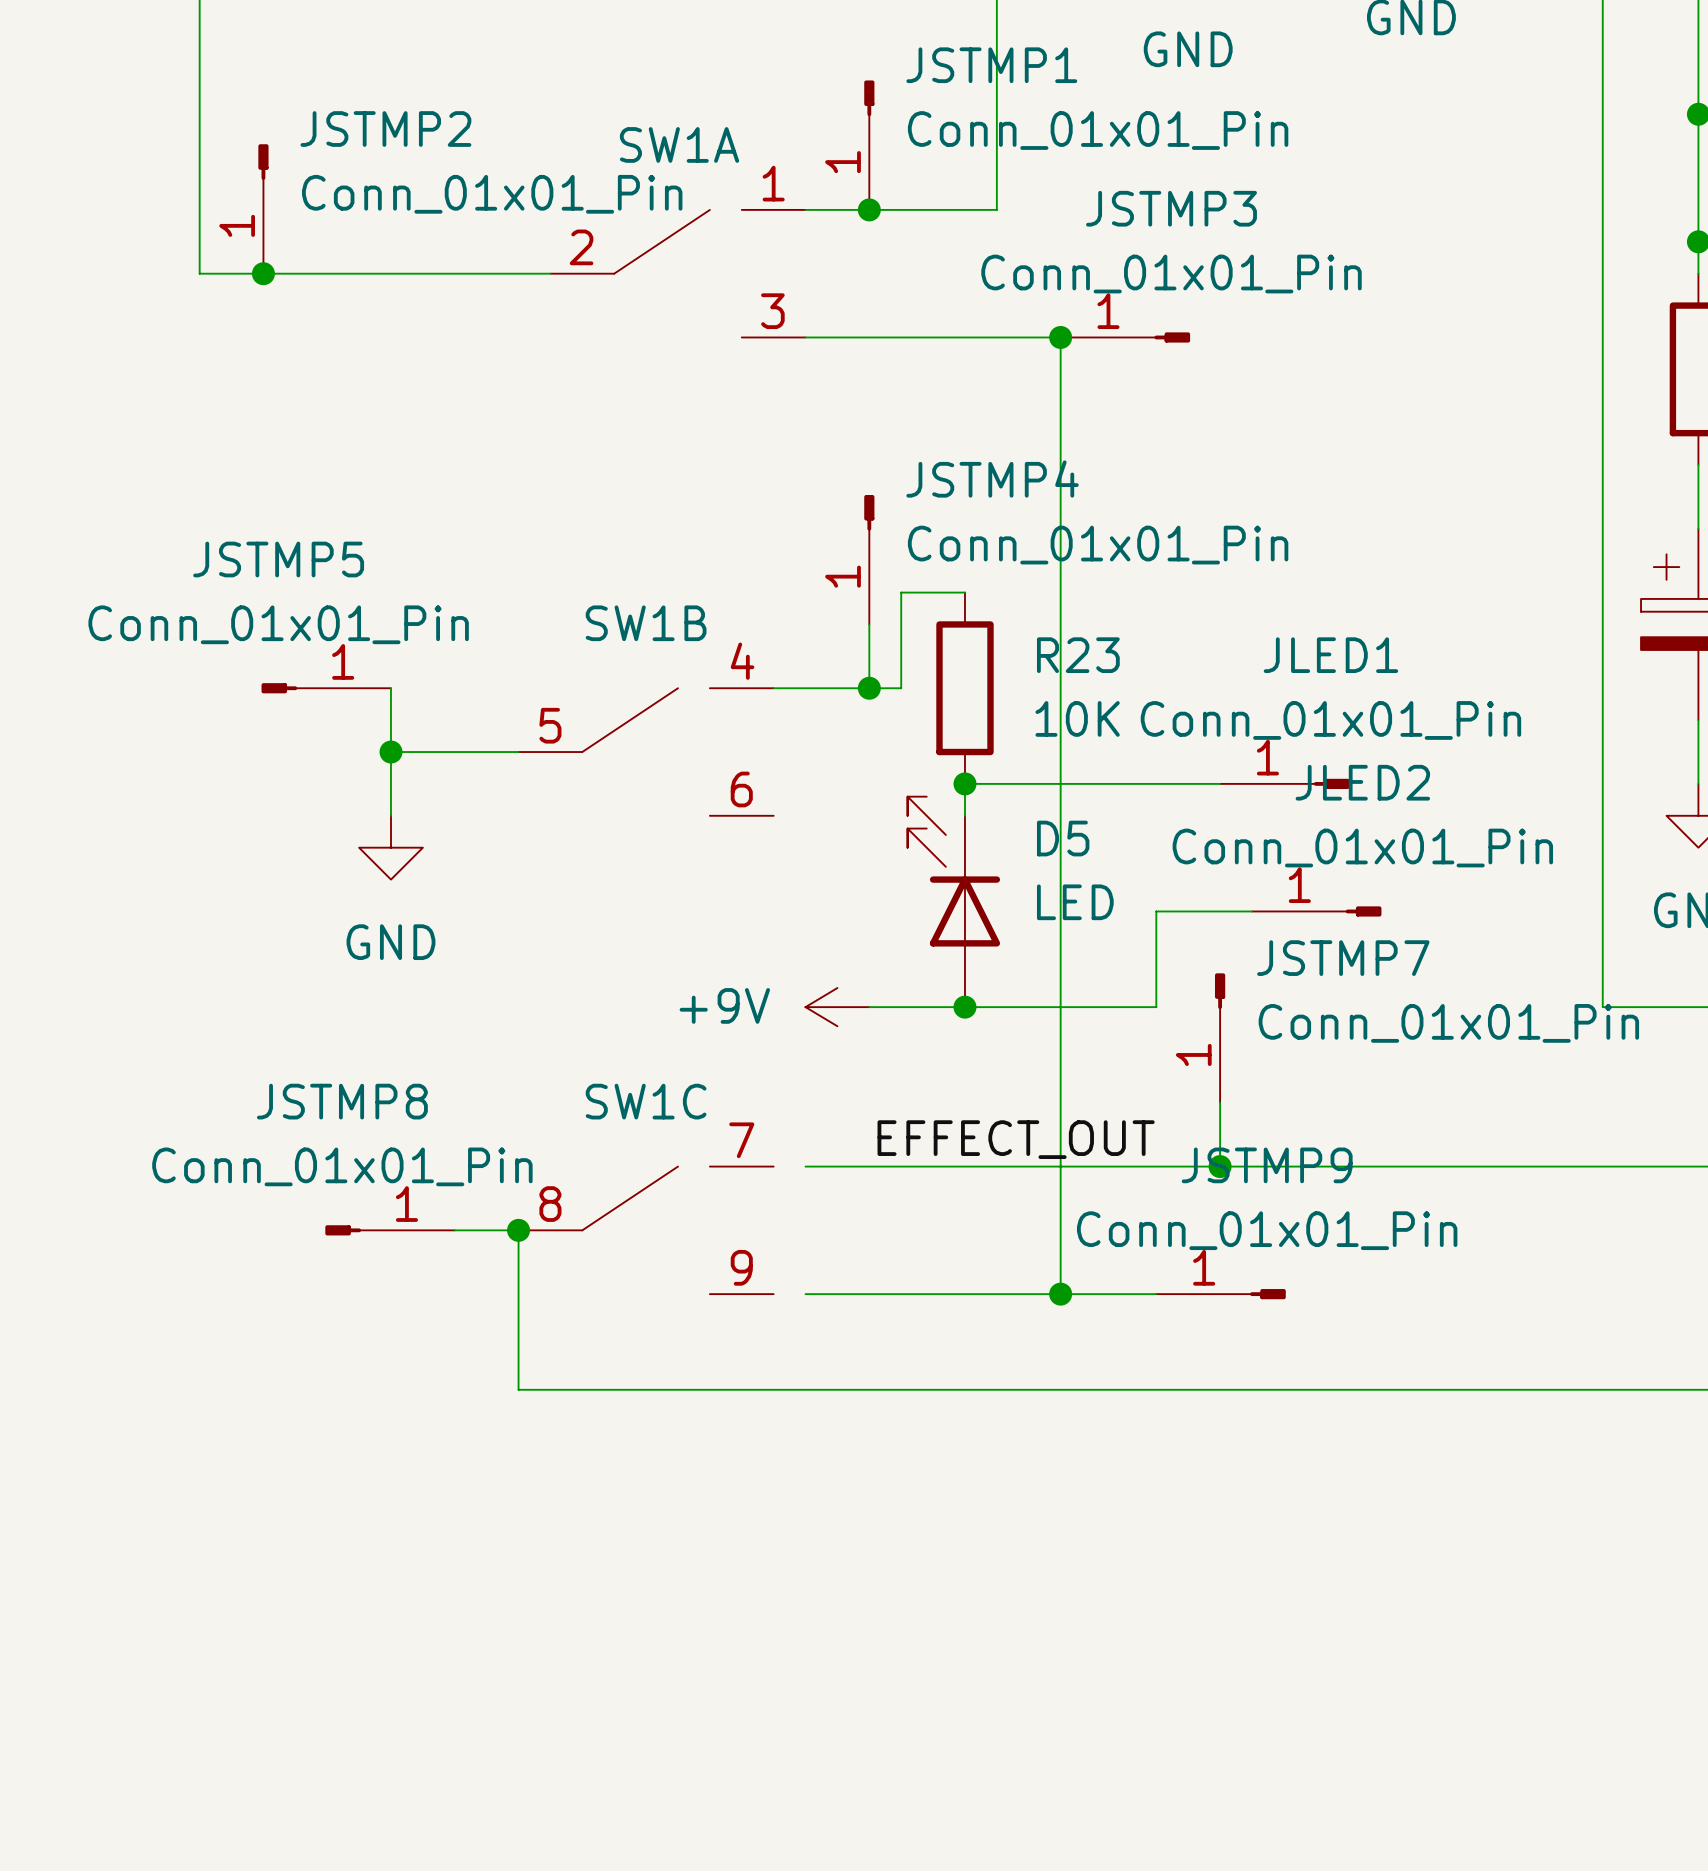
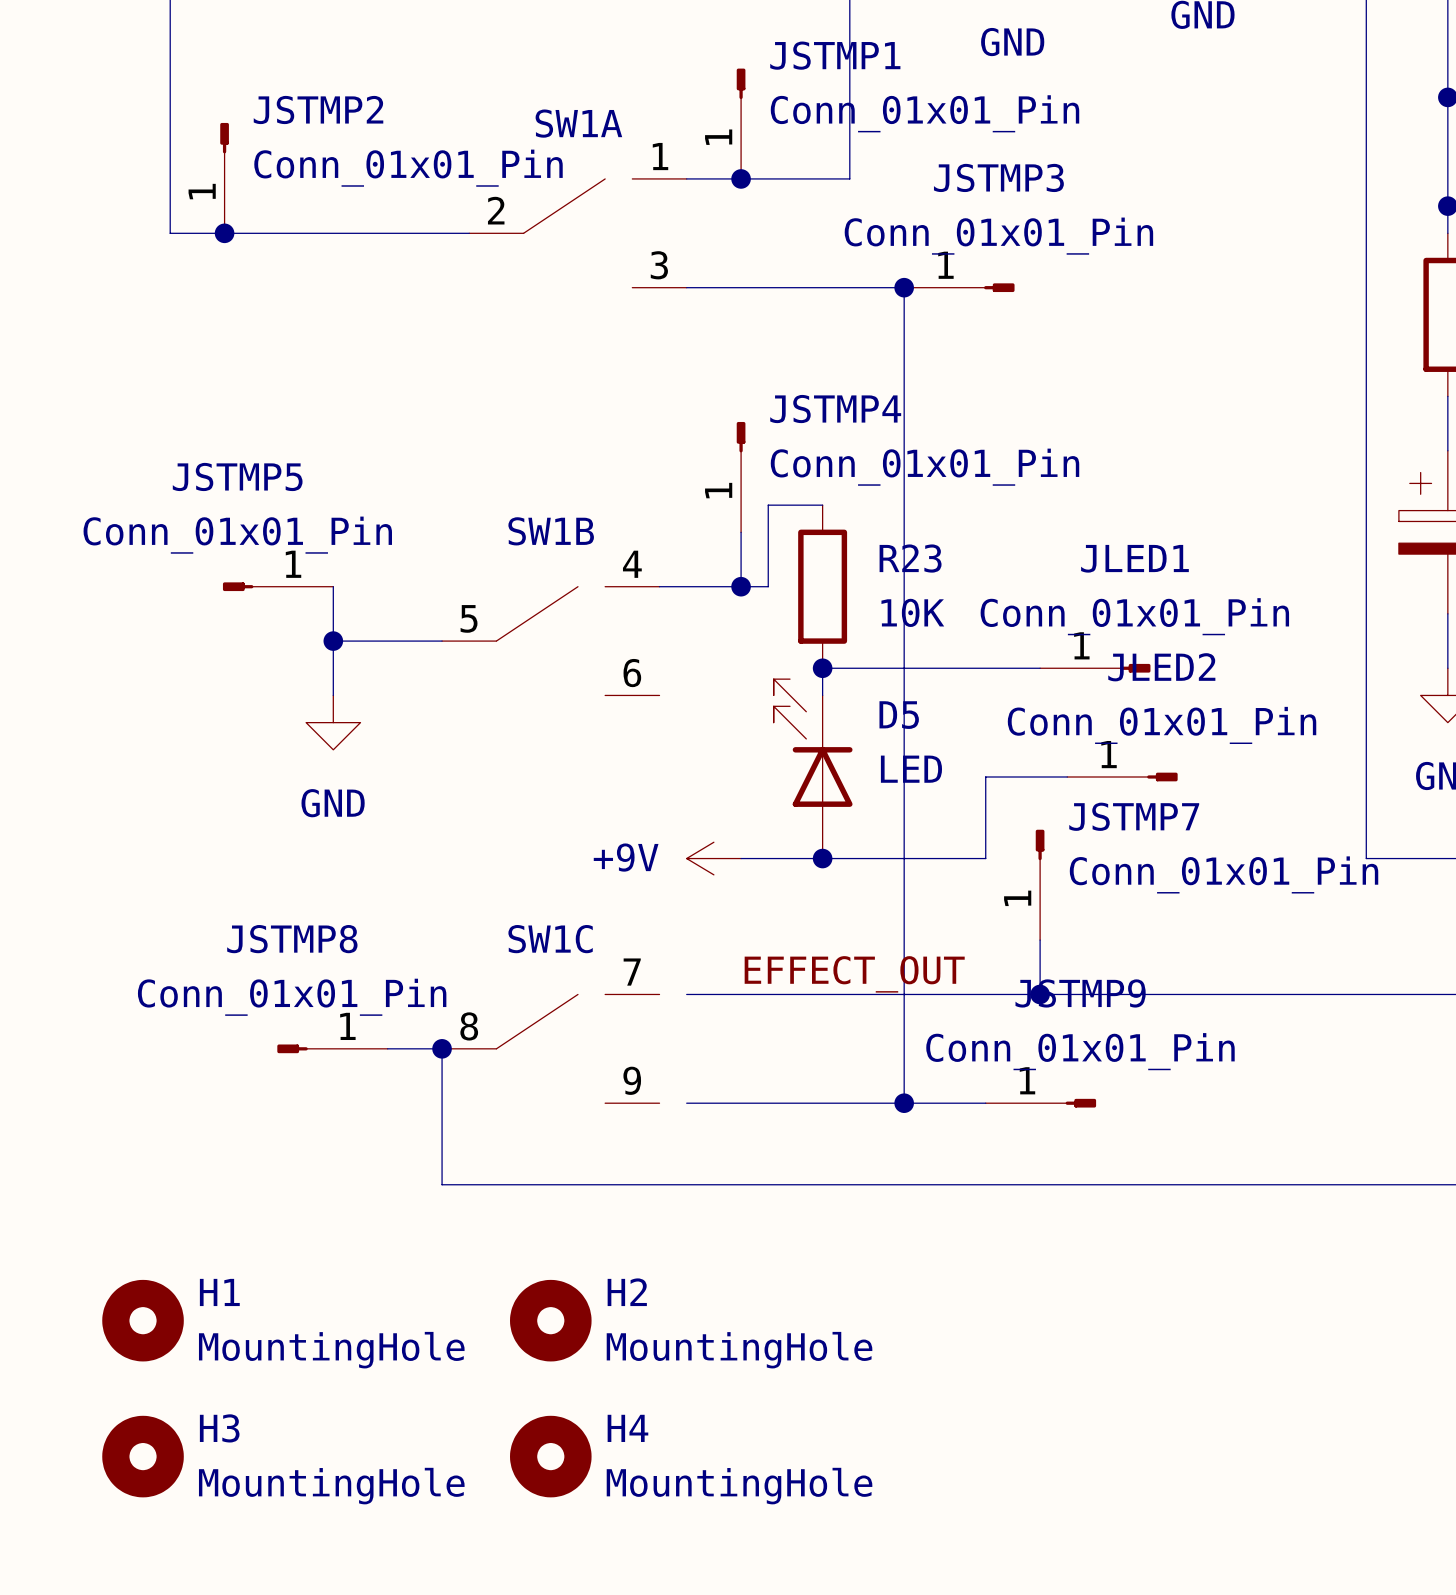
H1: none -> MountingHole (143, 1320)
H2: none -> MountingHole (550, 1320)
H3: none -> MountingHole (143, 1456)
H4: none -> MountingHole (550, 1456)

